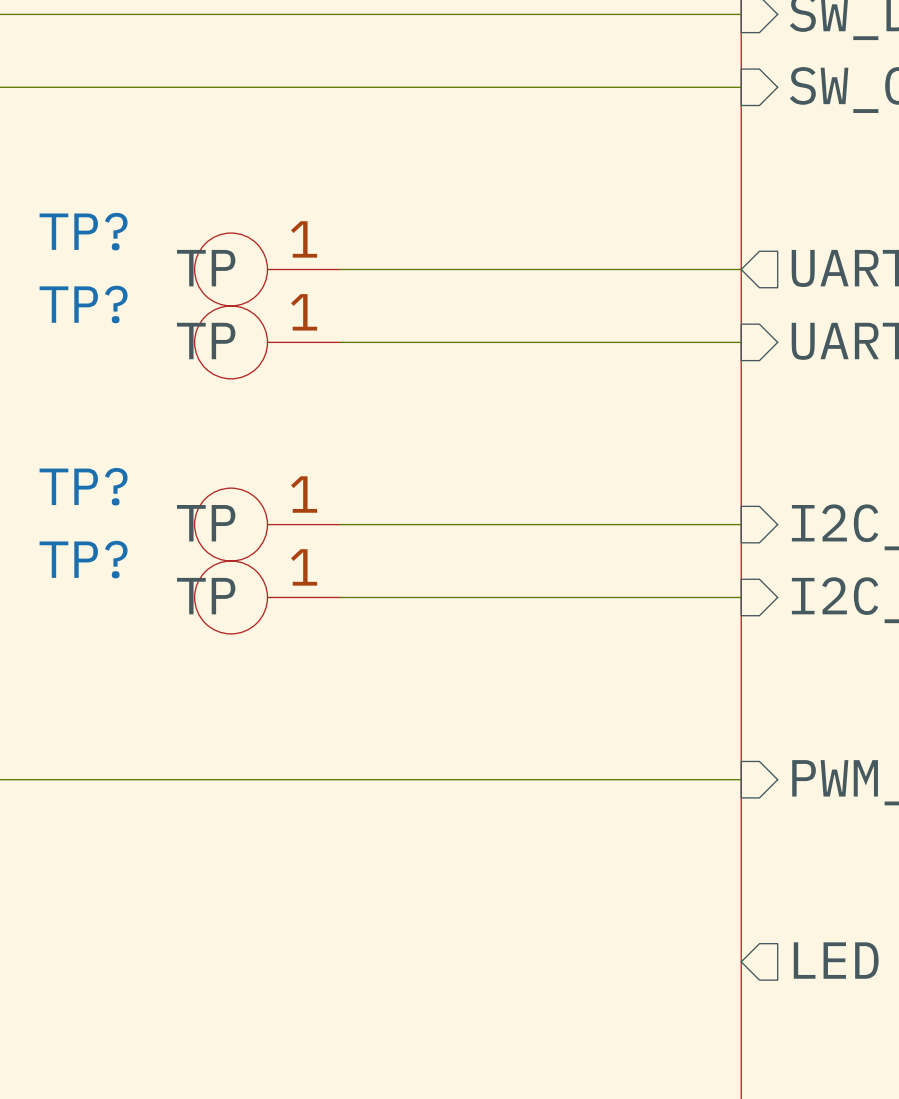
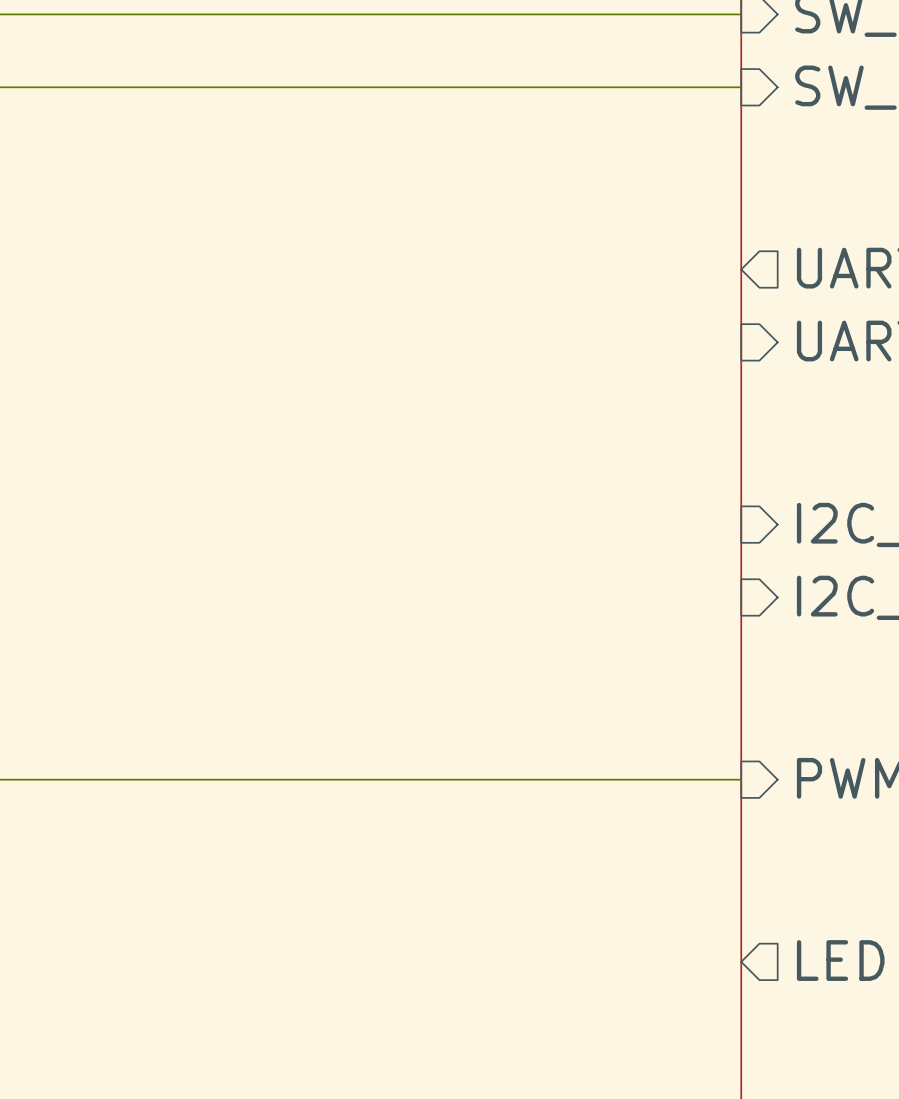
TP?: (267, 269) -> none
wire: (340, 269) (741, 269) -> none
TP?: (267, 342) -> none
wire: (340, 342) (741, 342) -> none
TP?: (267, 524) -> none
wire: (340, 524) (741, 524) -> none
TP?: (267, 597) -> none
wire: (340, 597) (741, 597) -> none

